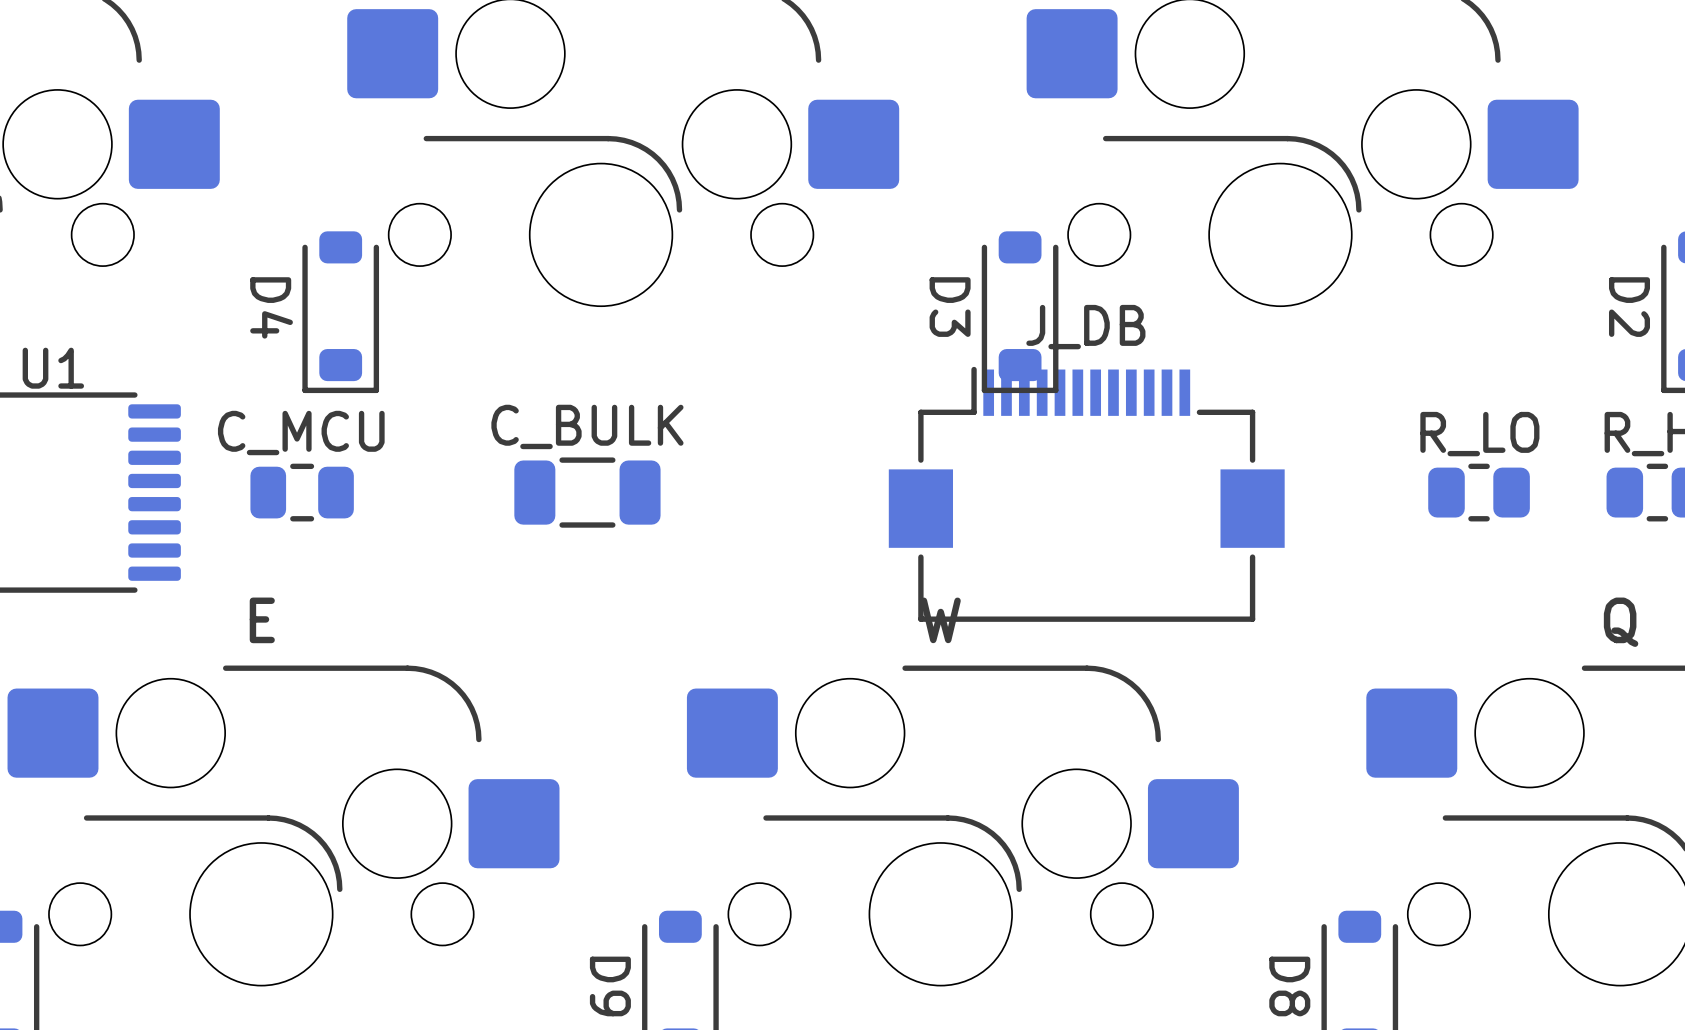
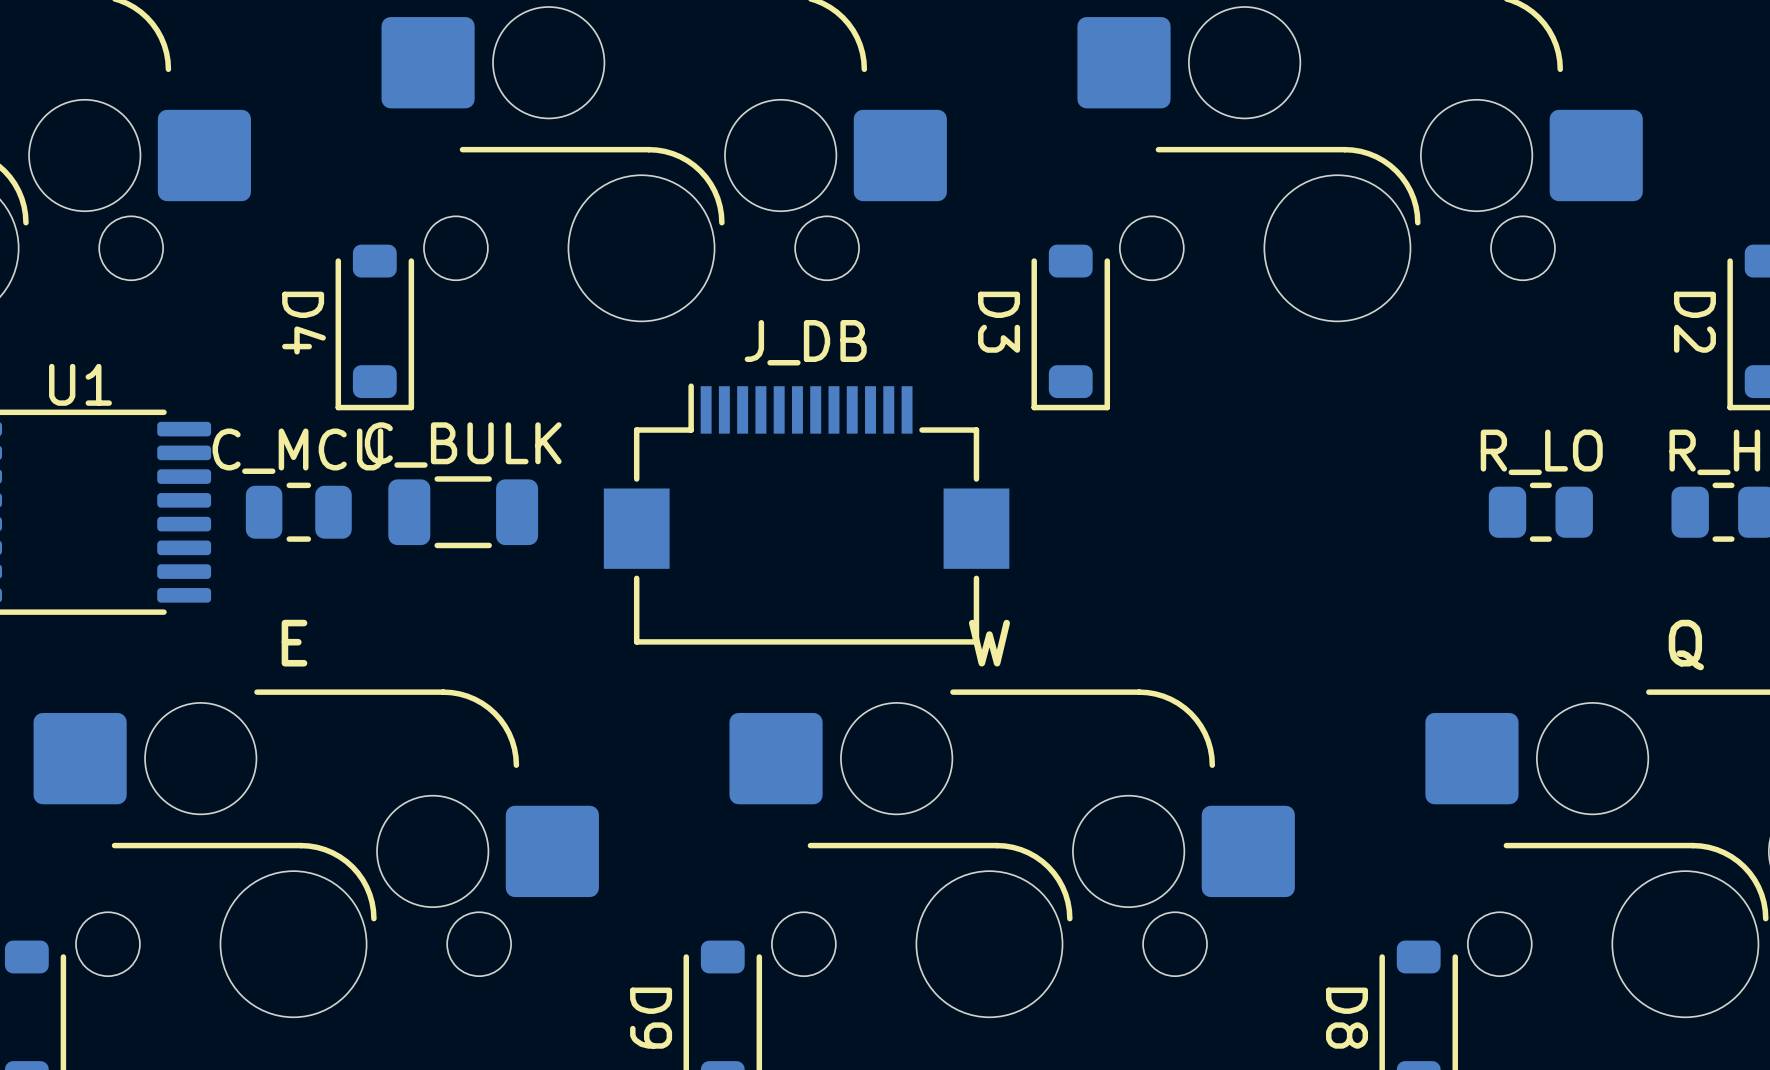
C_MCU position: (302, 492) -> (298, 512)
C_BULK position: (587, 492) -> (463, 512)
J_DB position: (1086, 494) -> (806, 514)

